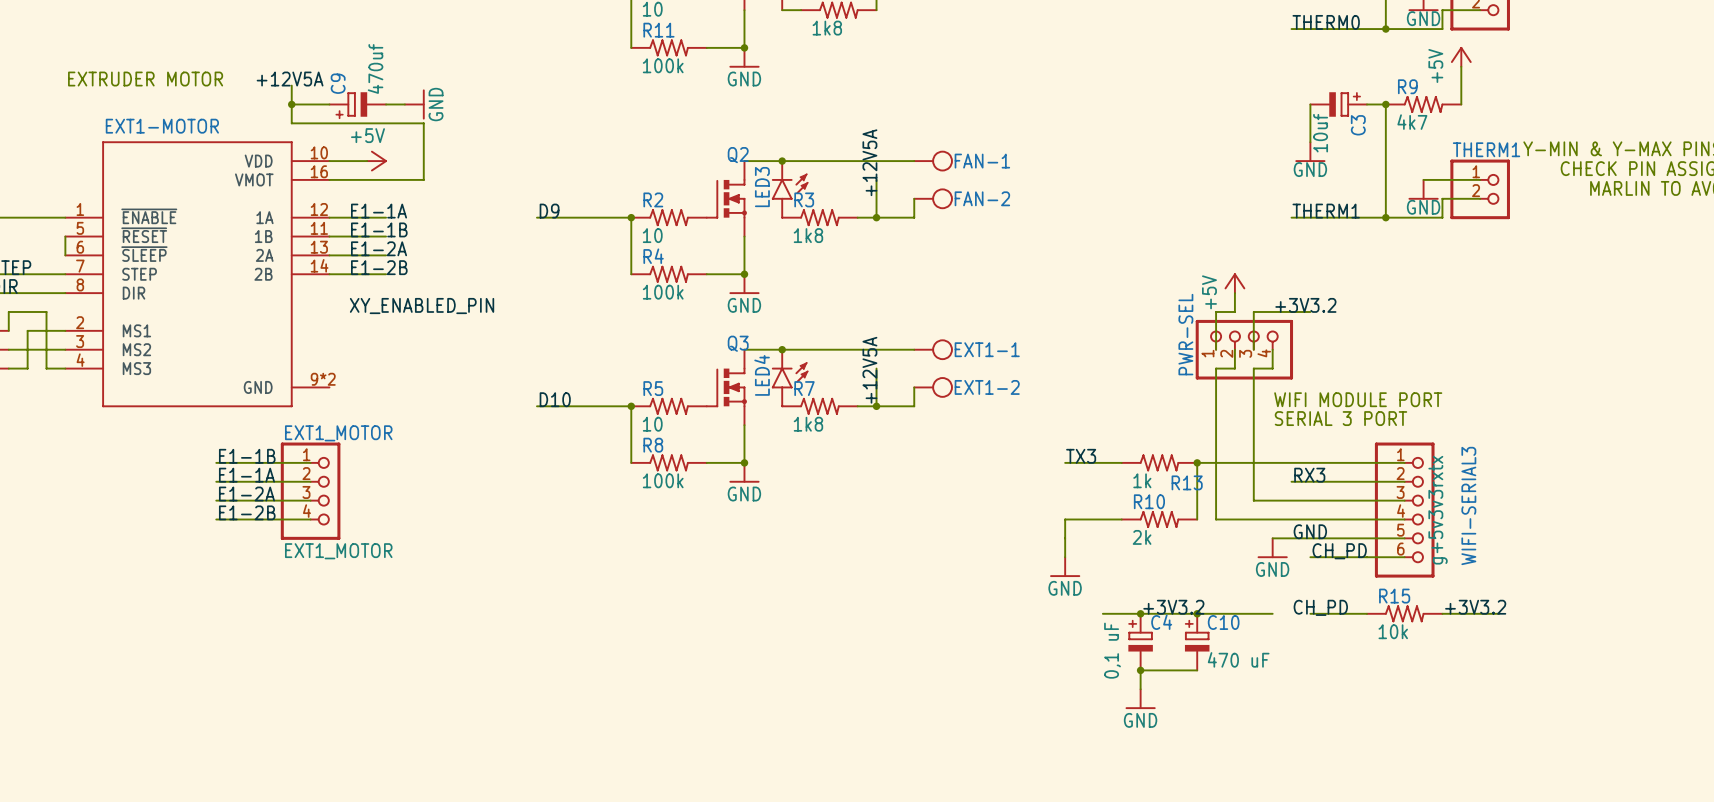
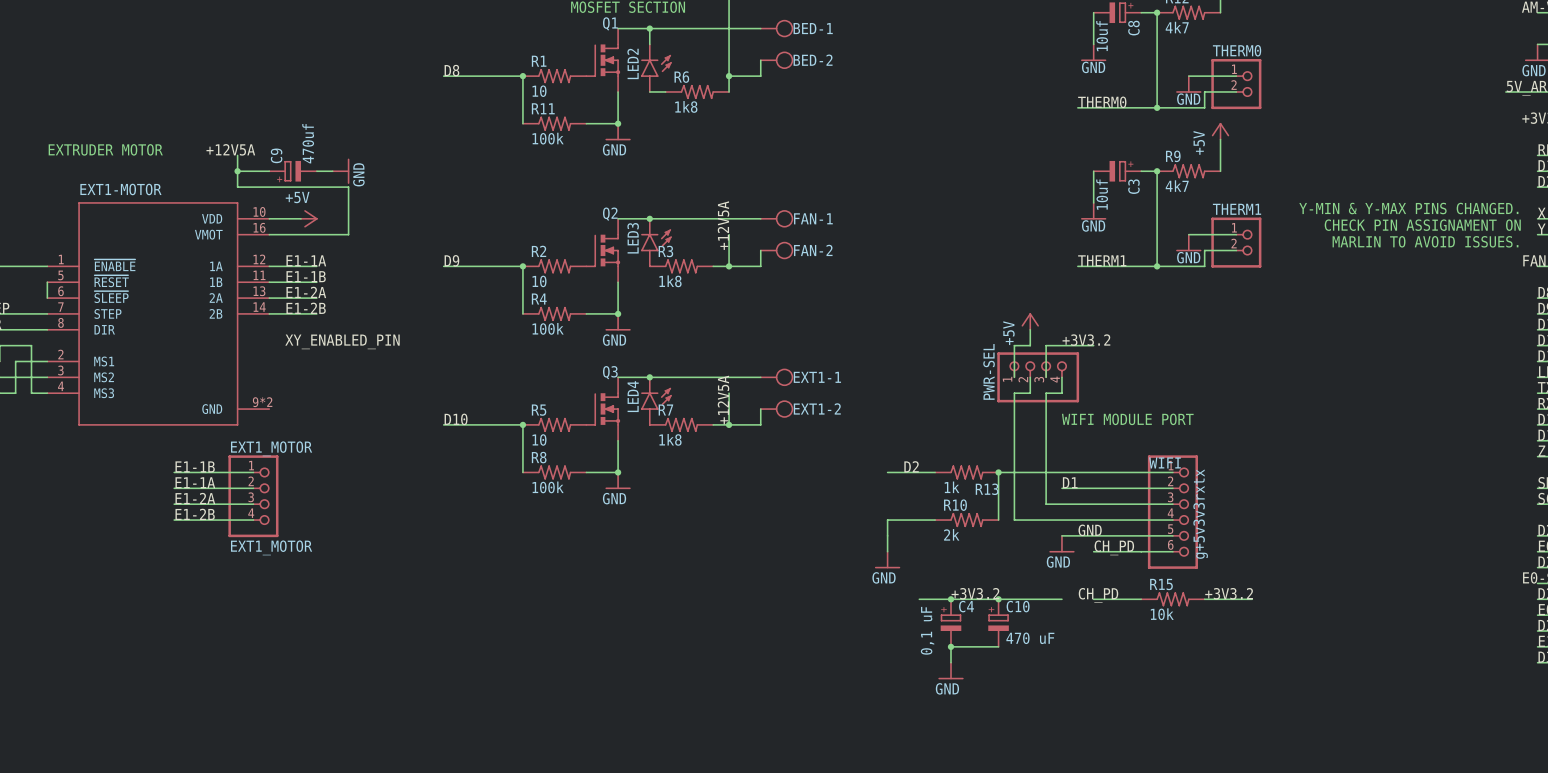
text: SERIAL 3 PORT (1340, 418) -> none
label: TX3 (1081, 456) -> none
label: none -> D2 (911, 466)
label: none -> D1 (1070, 482)
label: RX3 (1309, 475) -> none
wire: none -> (1061, 488) (1077, 488)
WIFI-SERIAL3 name: WIFI-SERIAL3 (1468, 505) -> WIFI (1164, 462)

